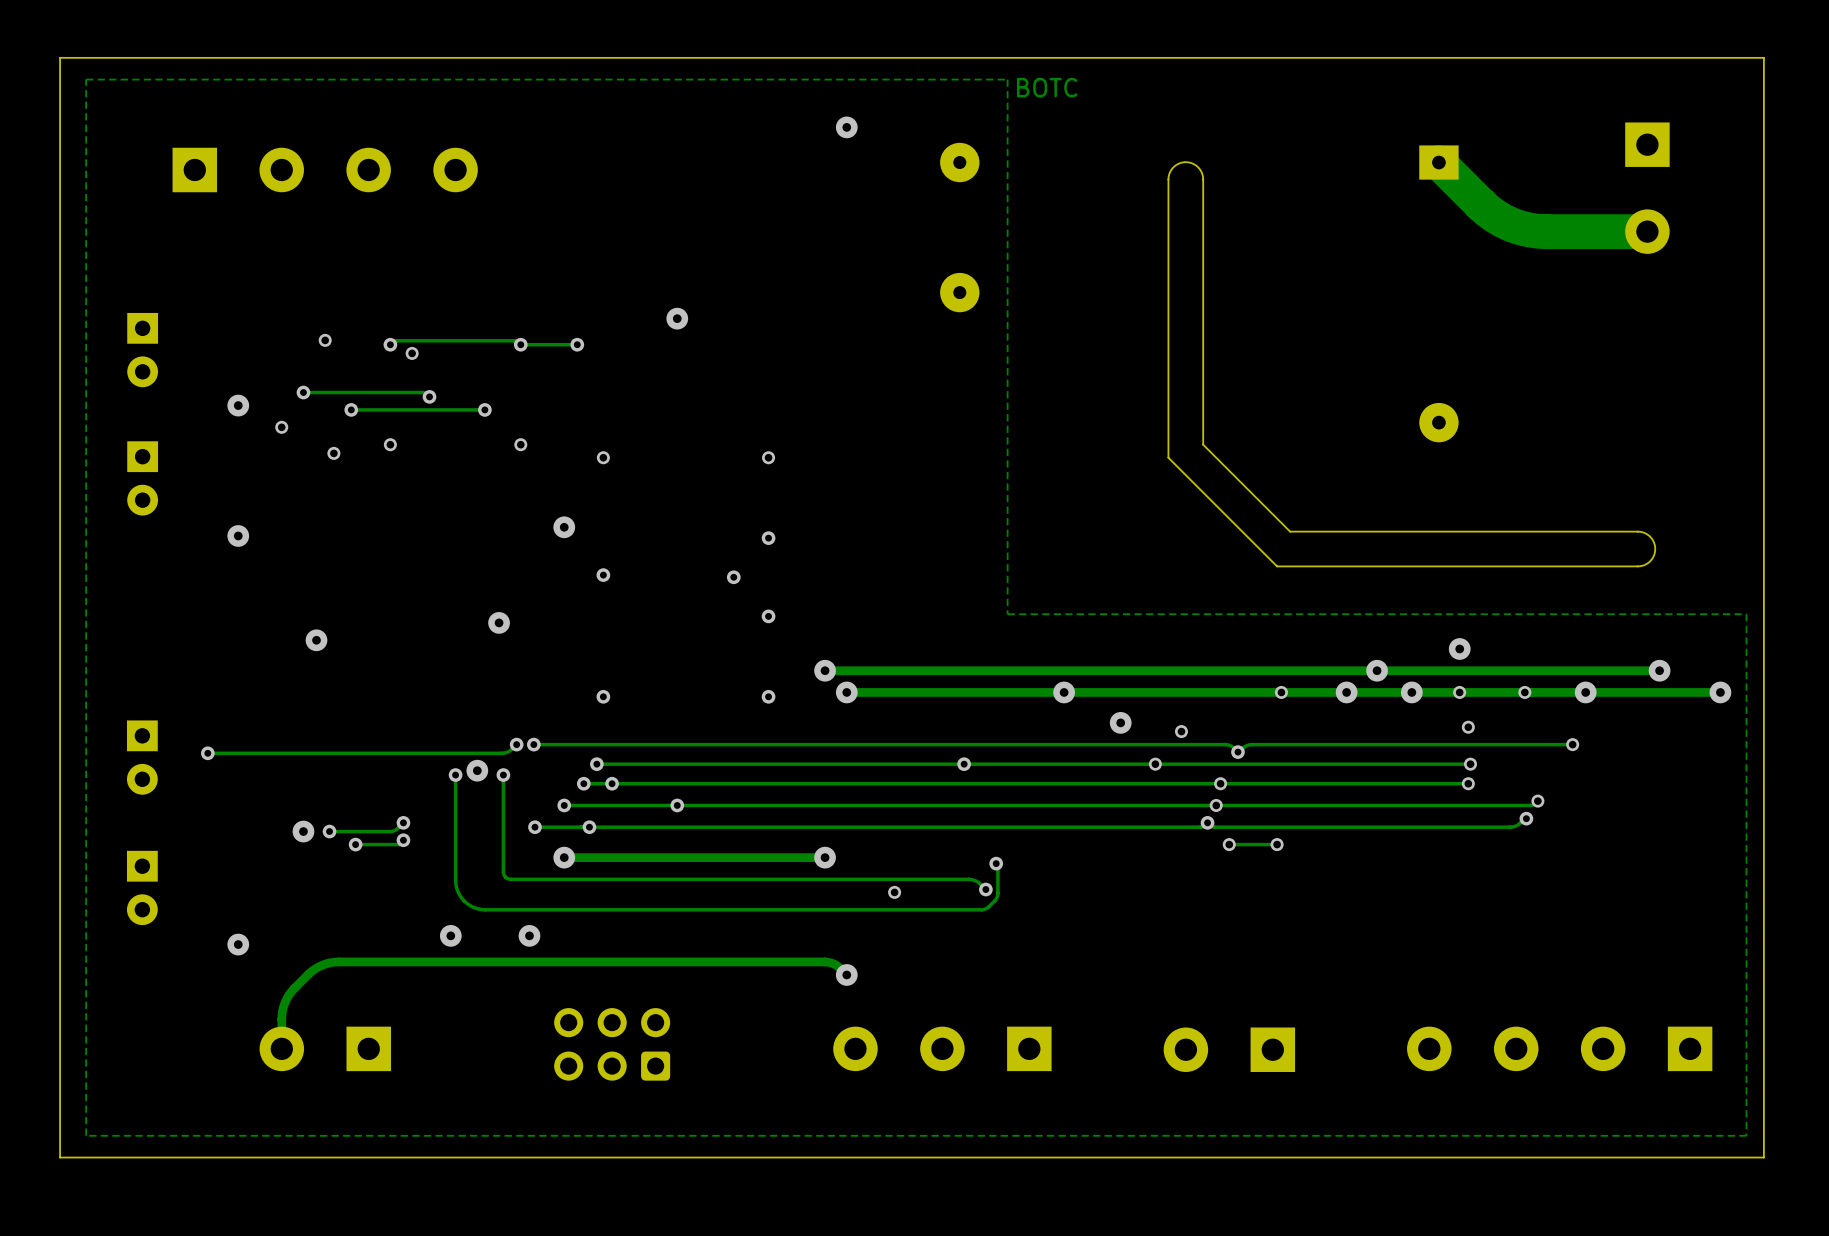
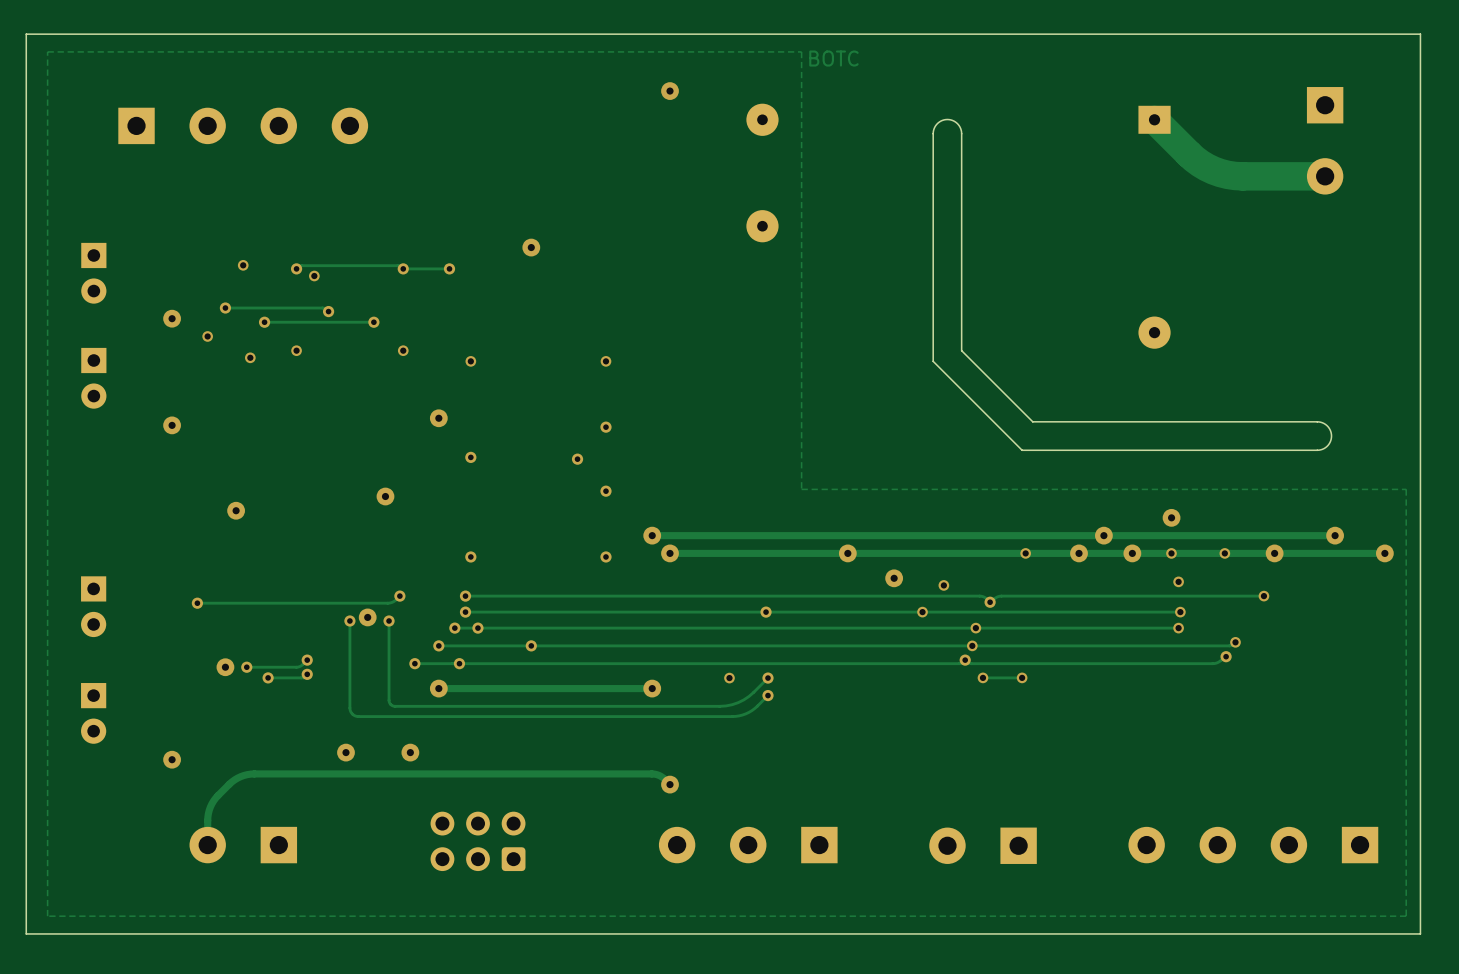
via position: (533, 744) -> (465, 596)
track: (596, 744) (533, 744) -> none
via position: (207, 753) -> (197, 603)
track: (269, 753) (207, 753) -> none
via: none -> (767, 678)
track: (996, 863) (997, 865) (997, 896) (988, 907) (981, 909) (485, 909) (473, 907) (464, 901) (457, 891) (455, 880) -> (767, 695) (749, 712) (732, 716) (358, 716) (352, 714) (349, 706)
via: (996, 863) -> none
via: none -> (767, 695)
track: (907, 879) (970, 879) (978, 882) (985, 889) -> (719, 706) (732, 704) (743, 699) (767, 678)
via: (985, 889) -> none
via position: (894, 892) -> (729, 678)

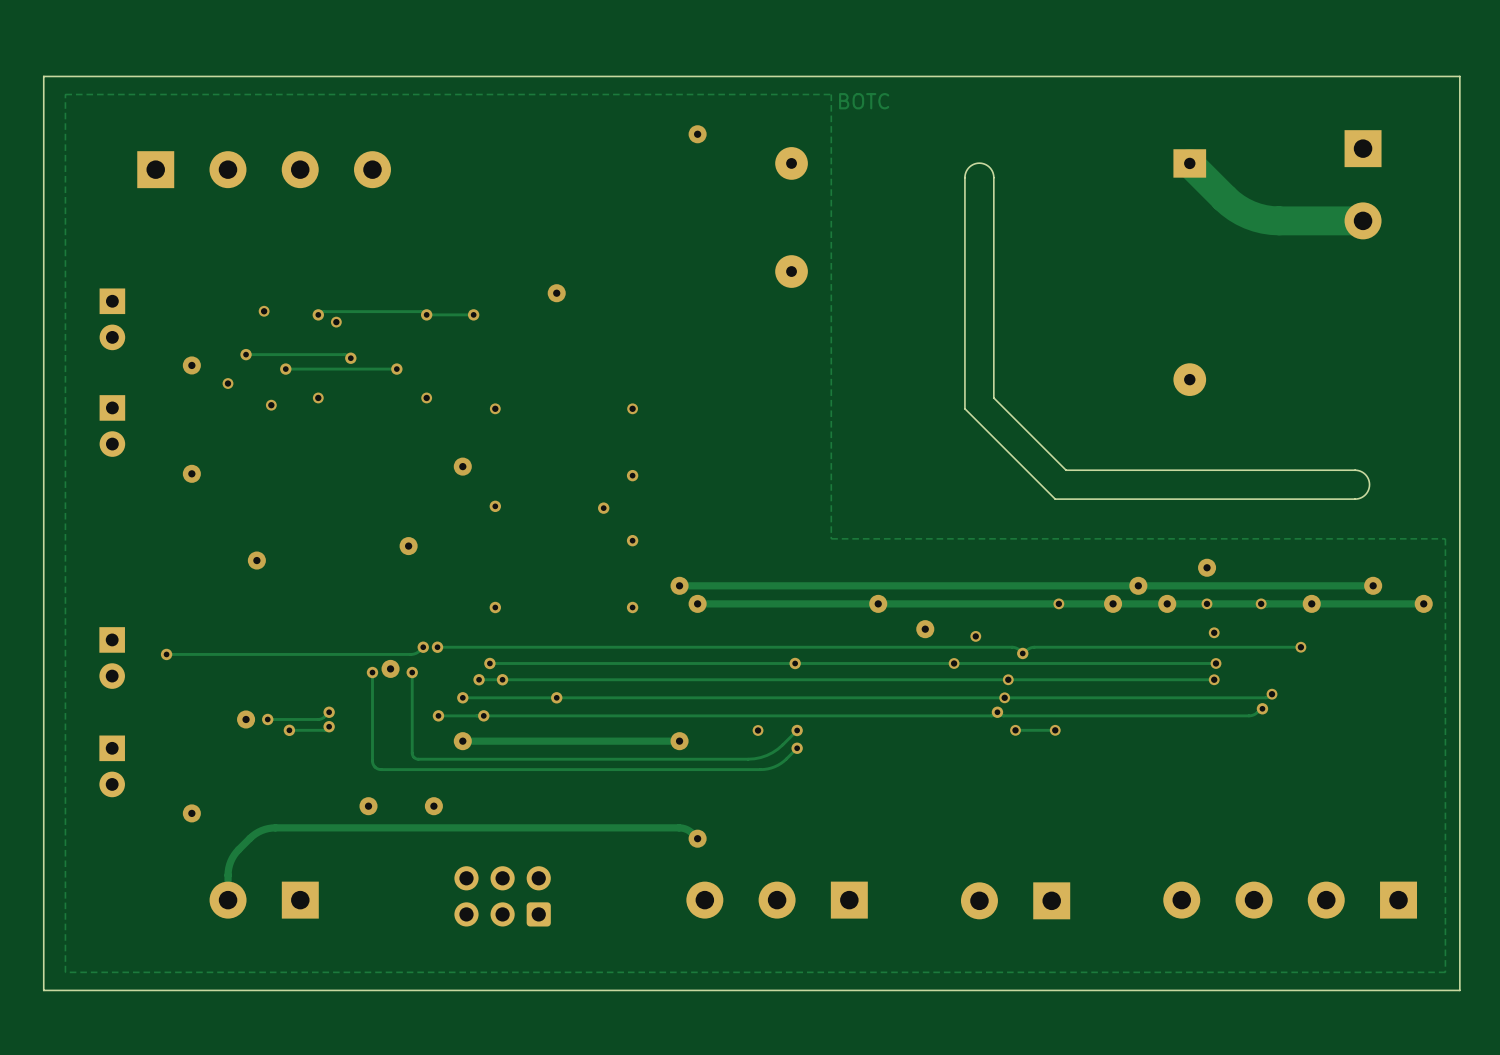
track: none -> (489, 647) (437, 647)
via position: (465, 596) -> (437, 647)
track: none -> (217, 654) (166, 654)
via position: (197, 603) -> (166, 654)

